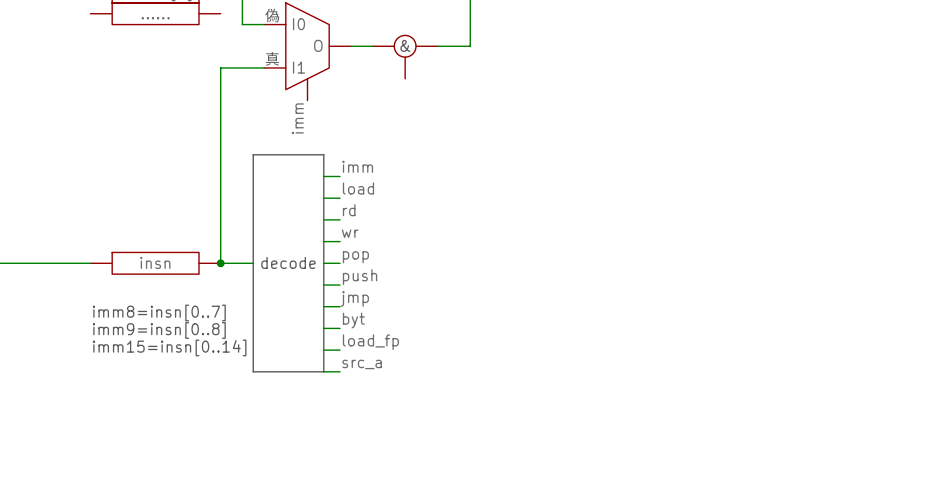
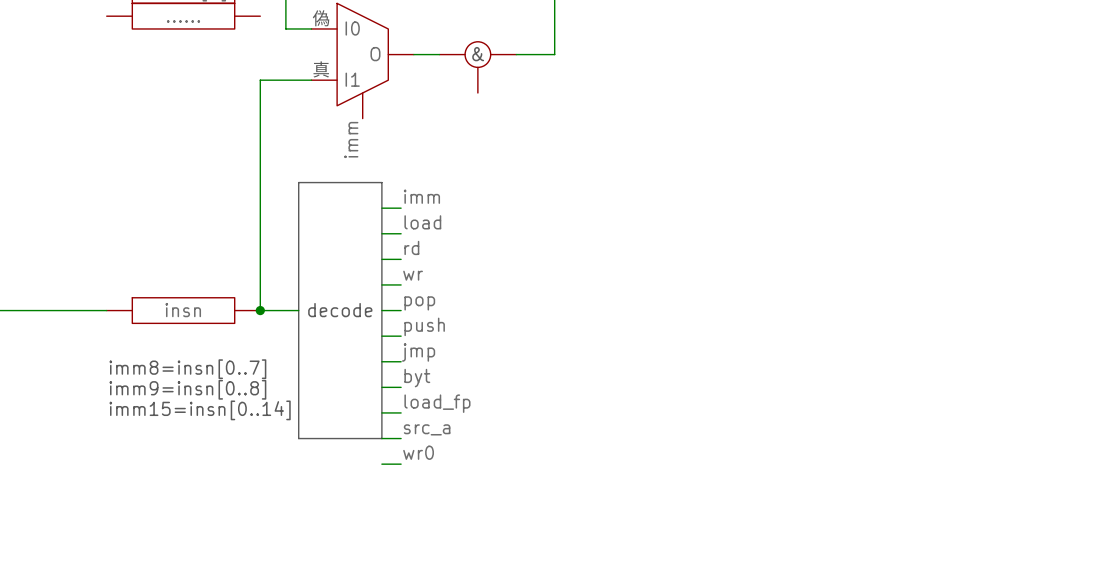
label: none -> wr0 (418, 452)
wire: none -> (381, 464) (401, 464)

